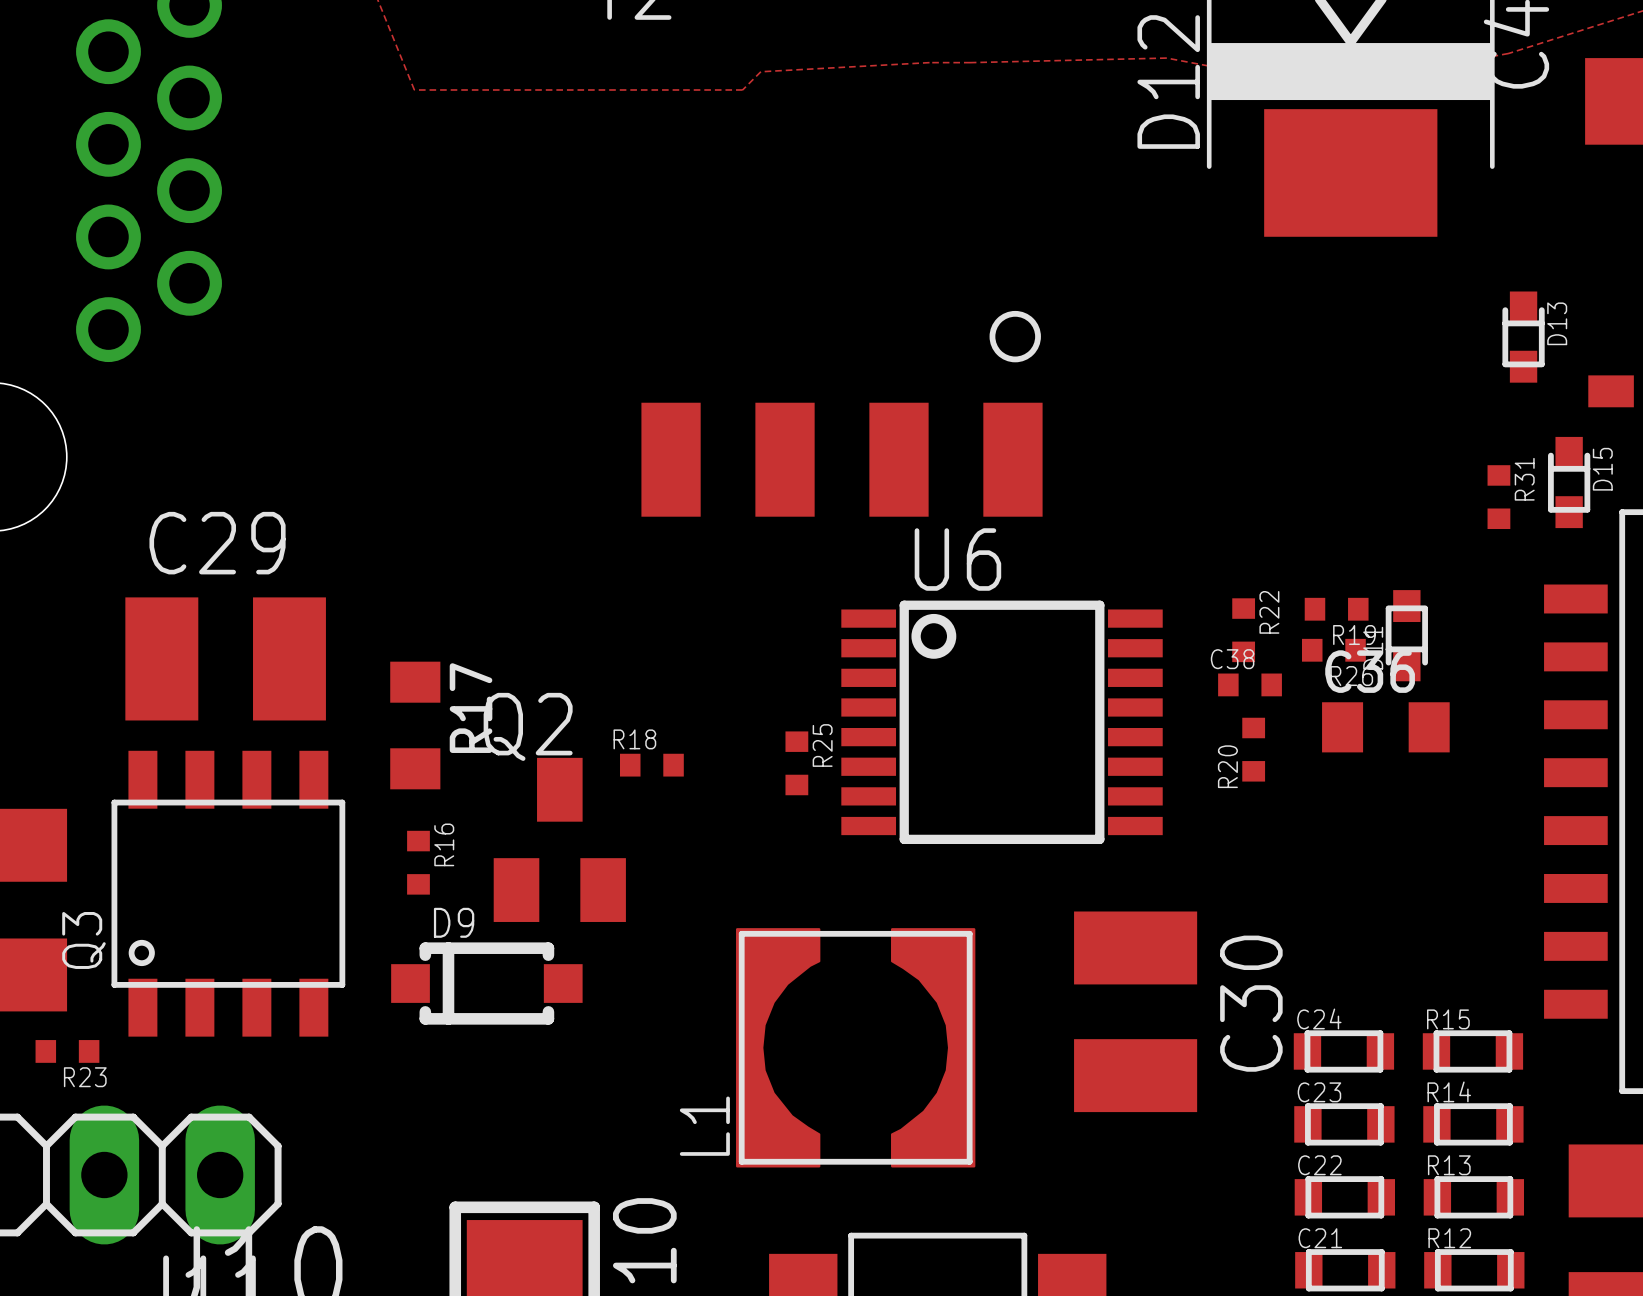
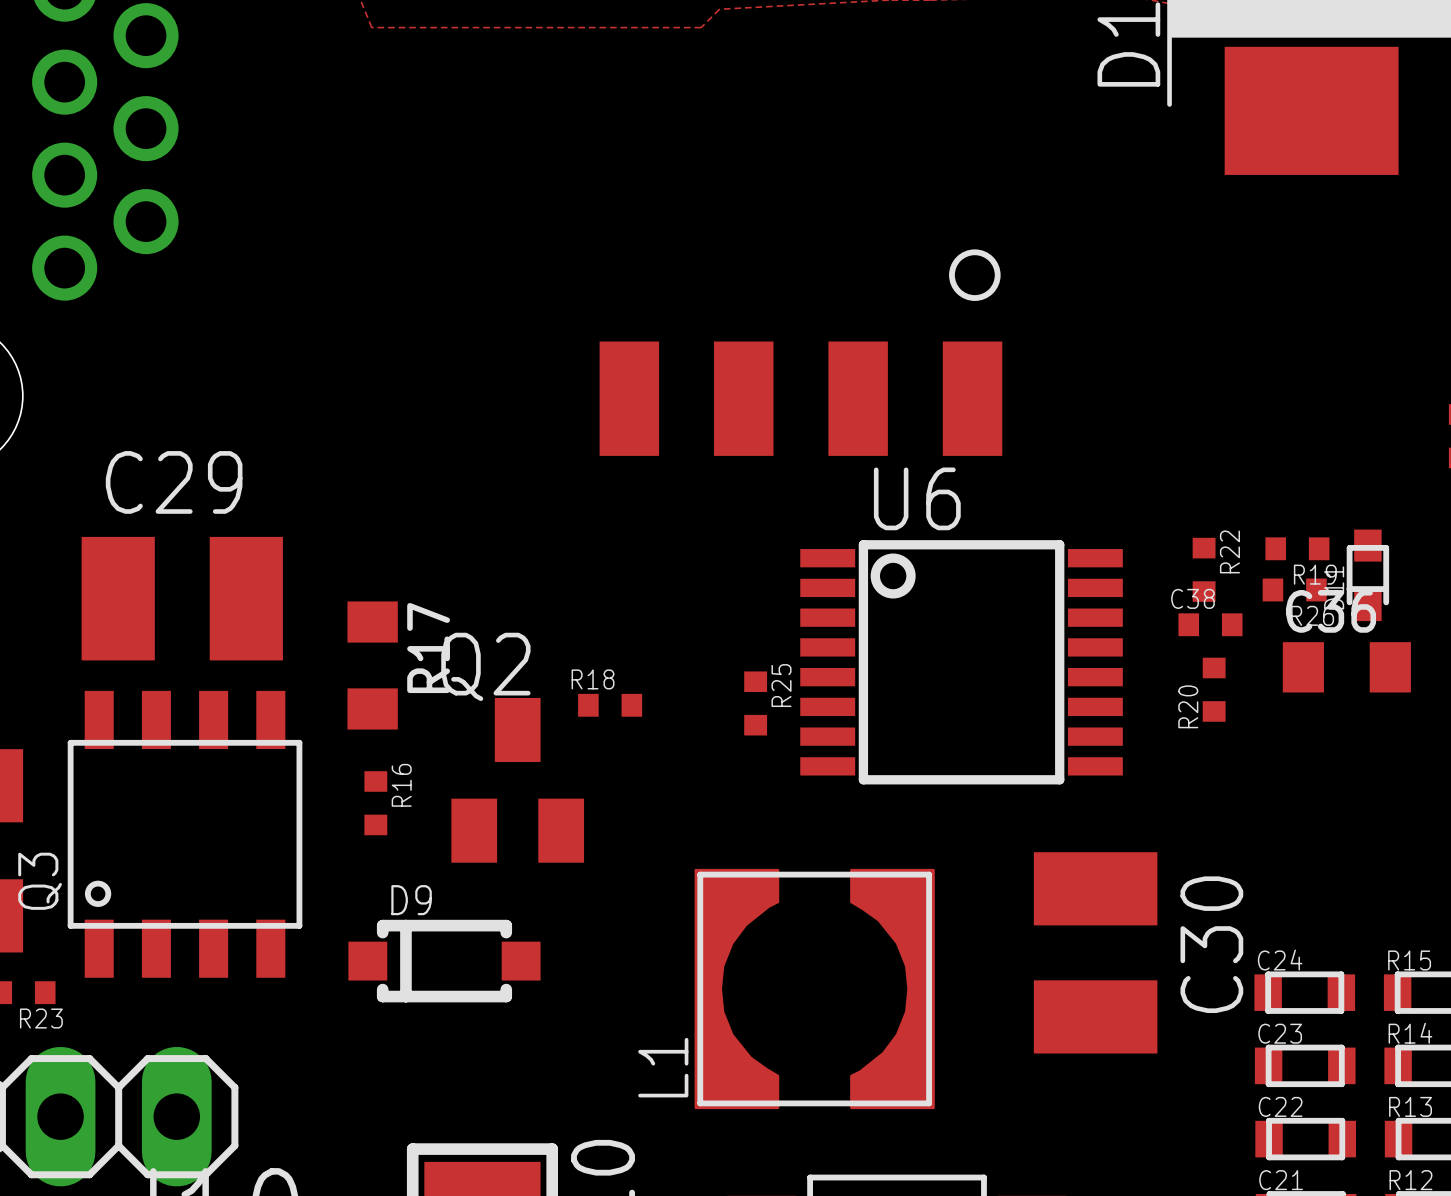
D9 position: (486, 983) -> (444, 961)

